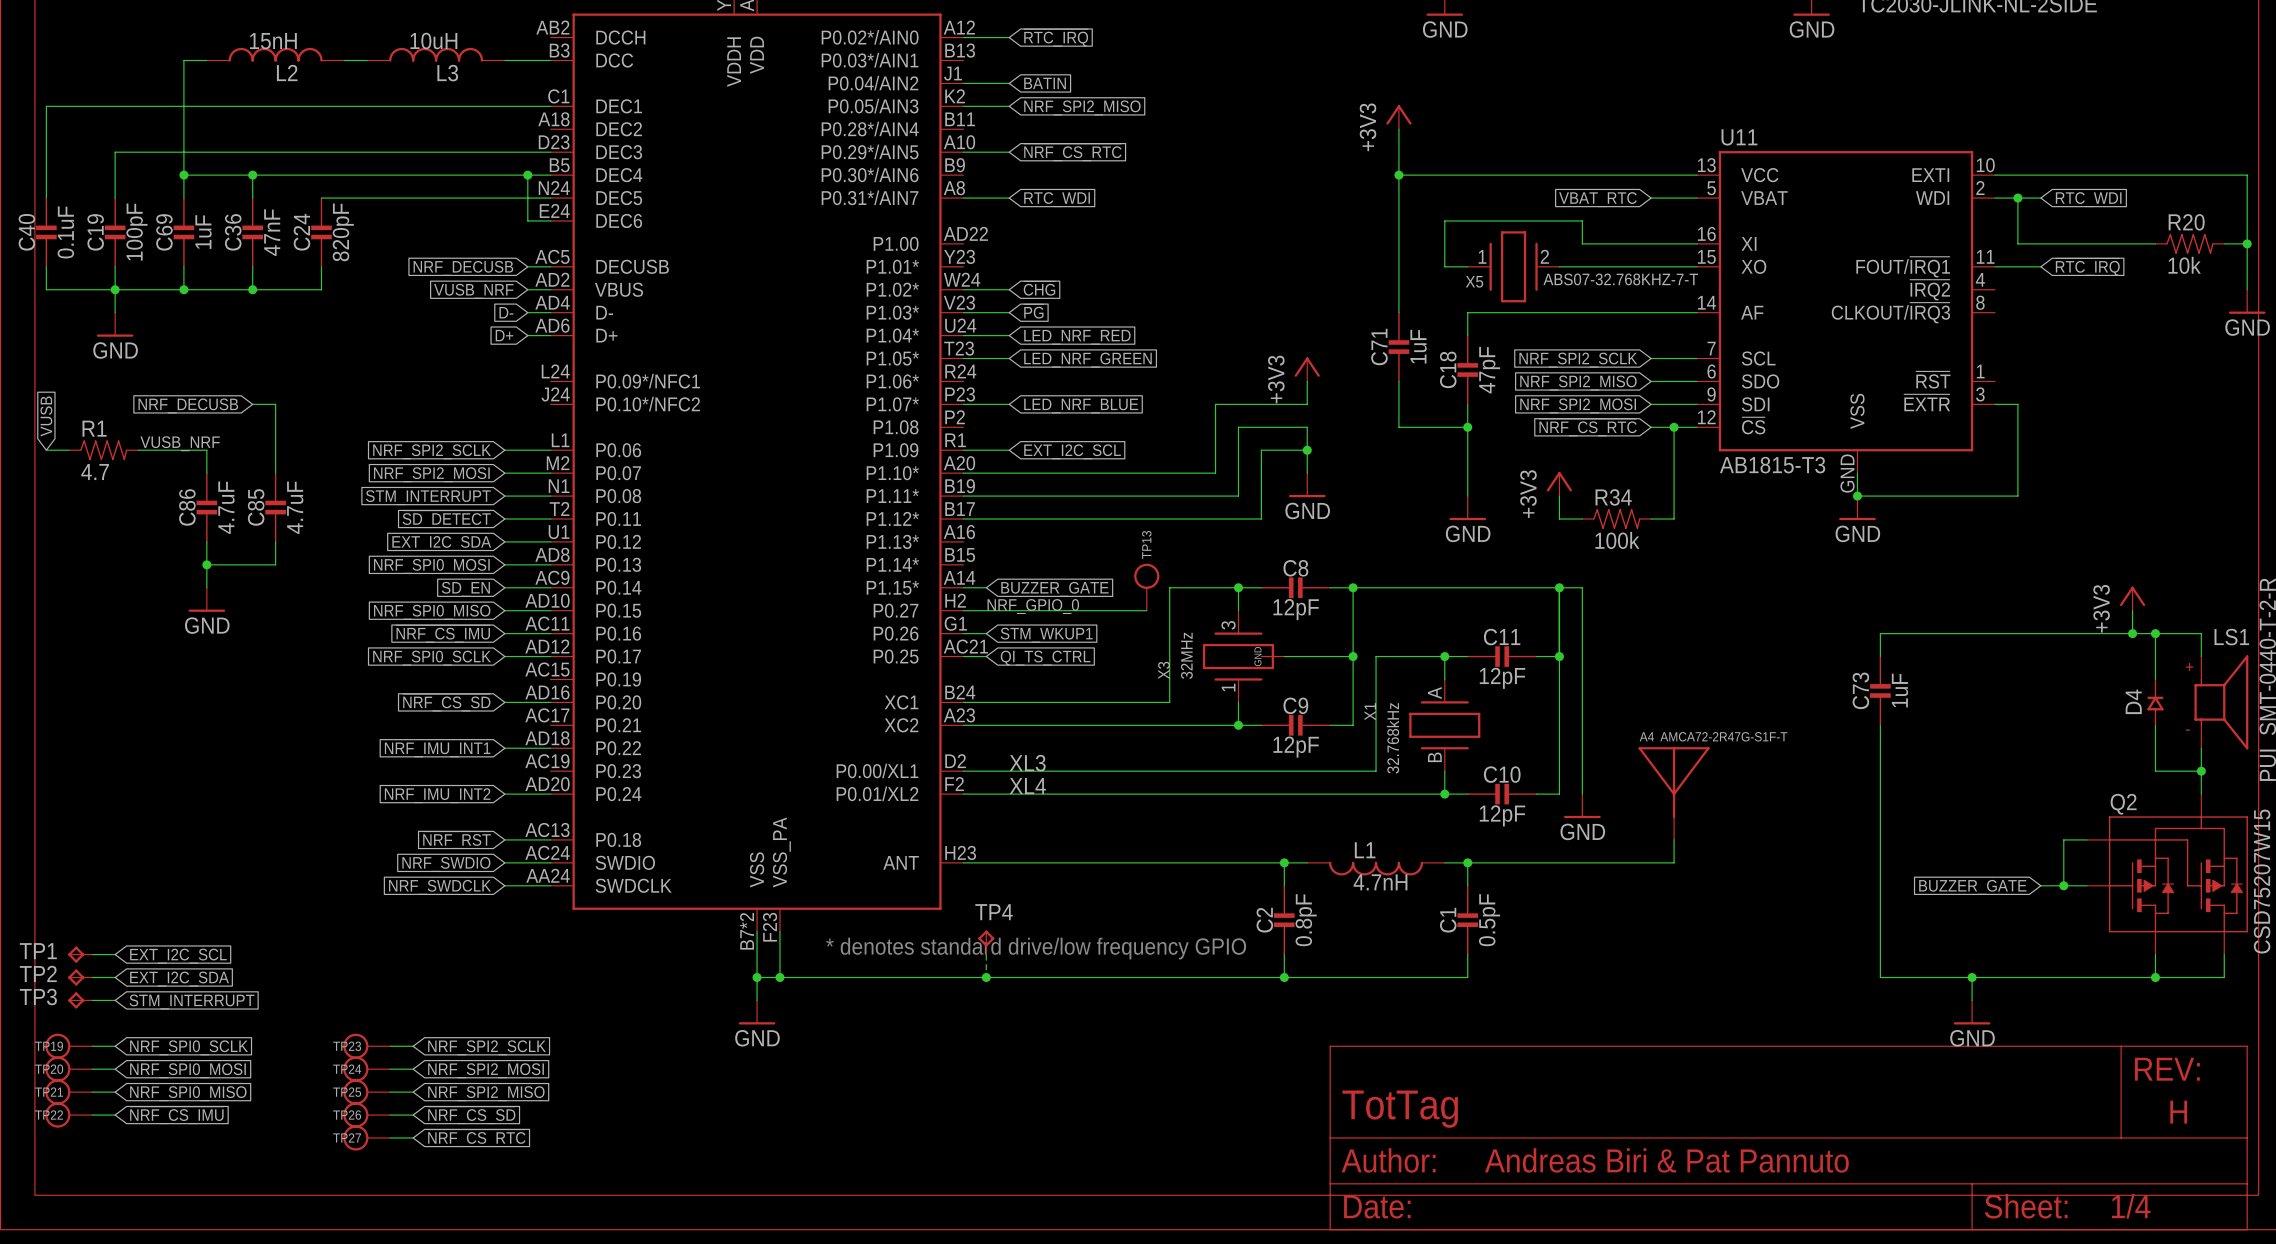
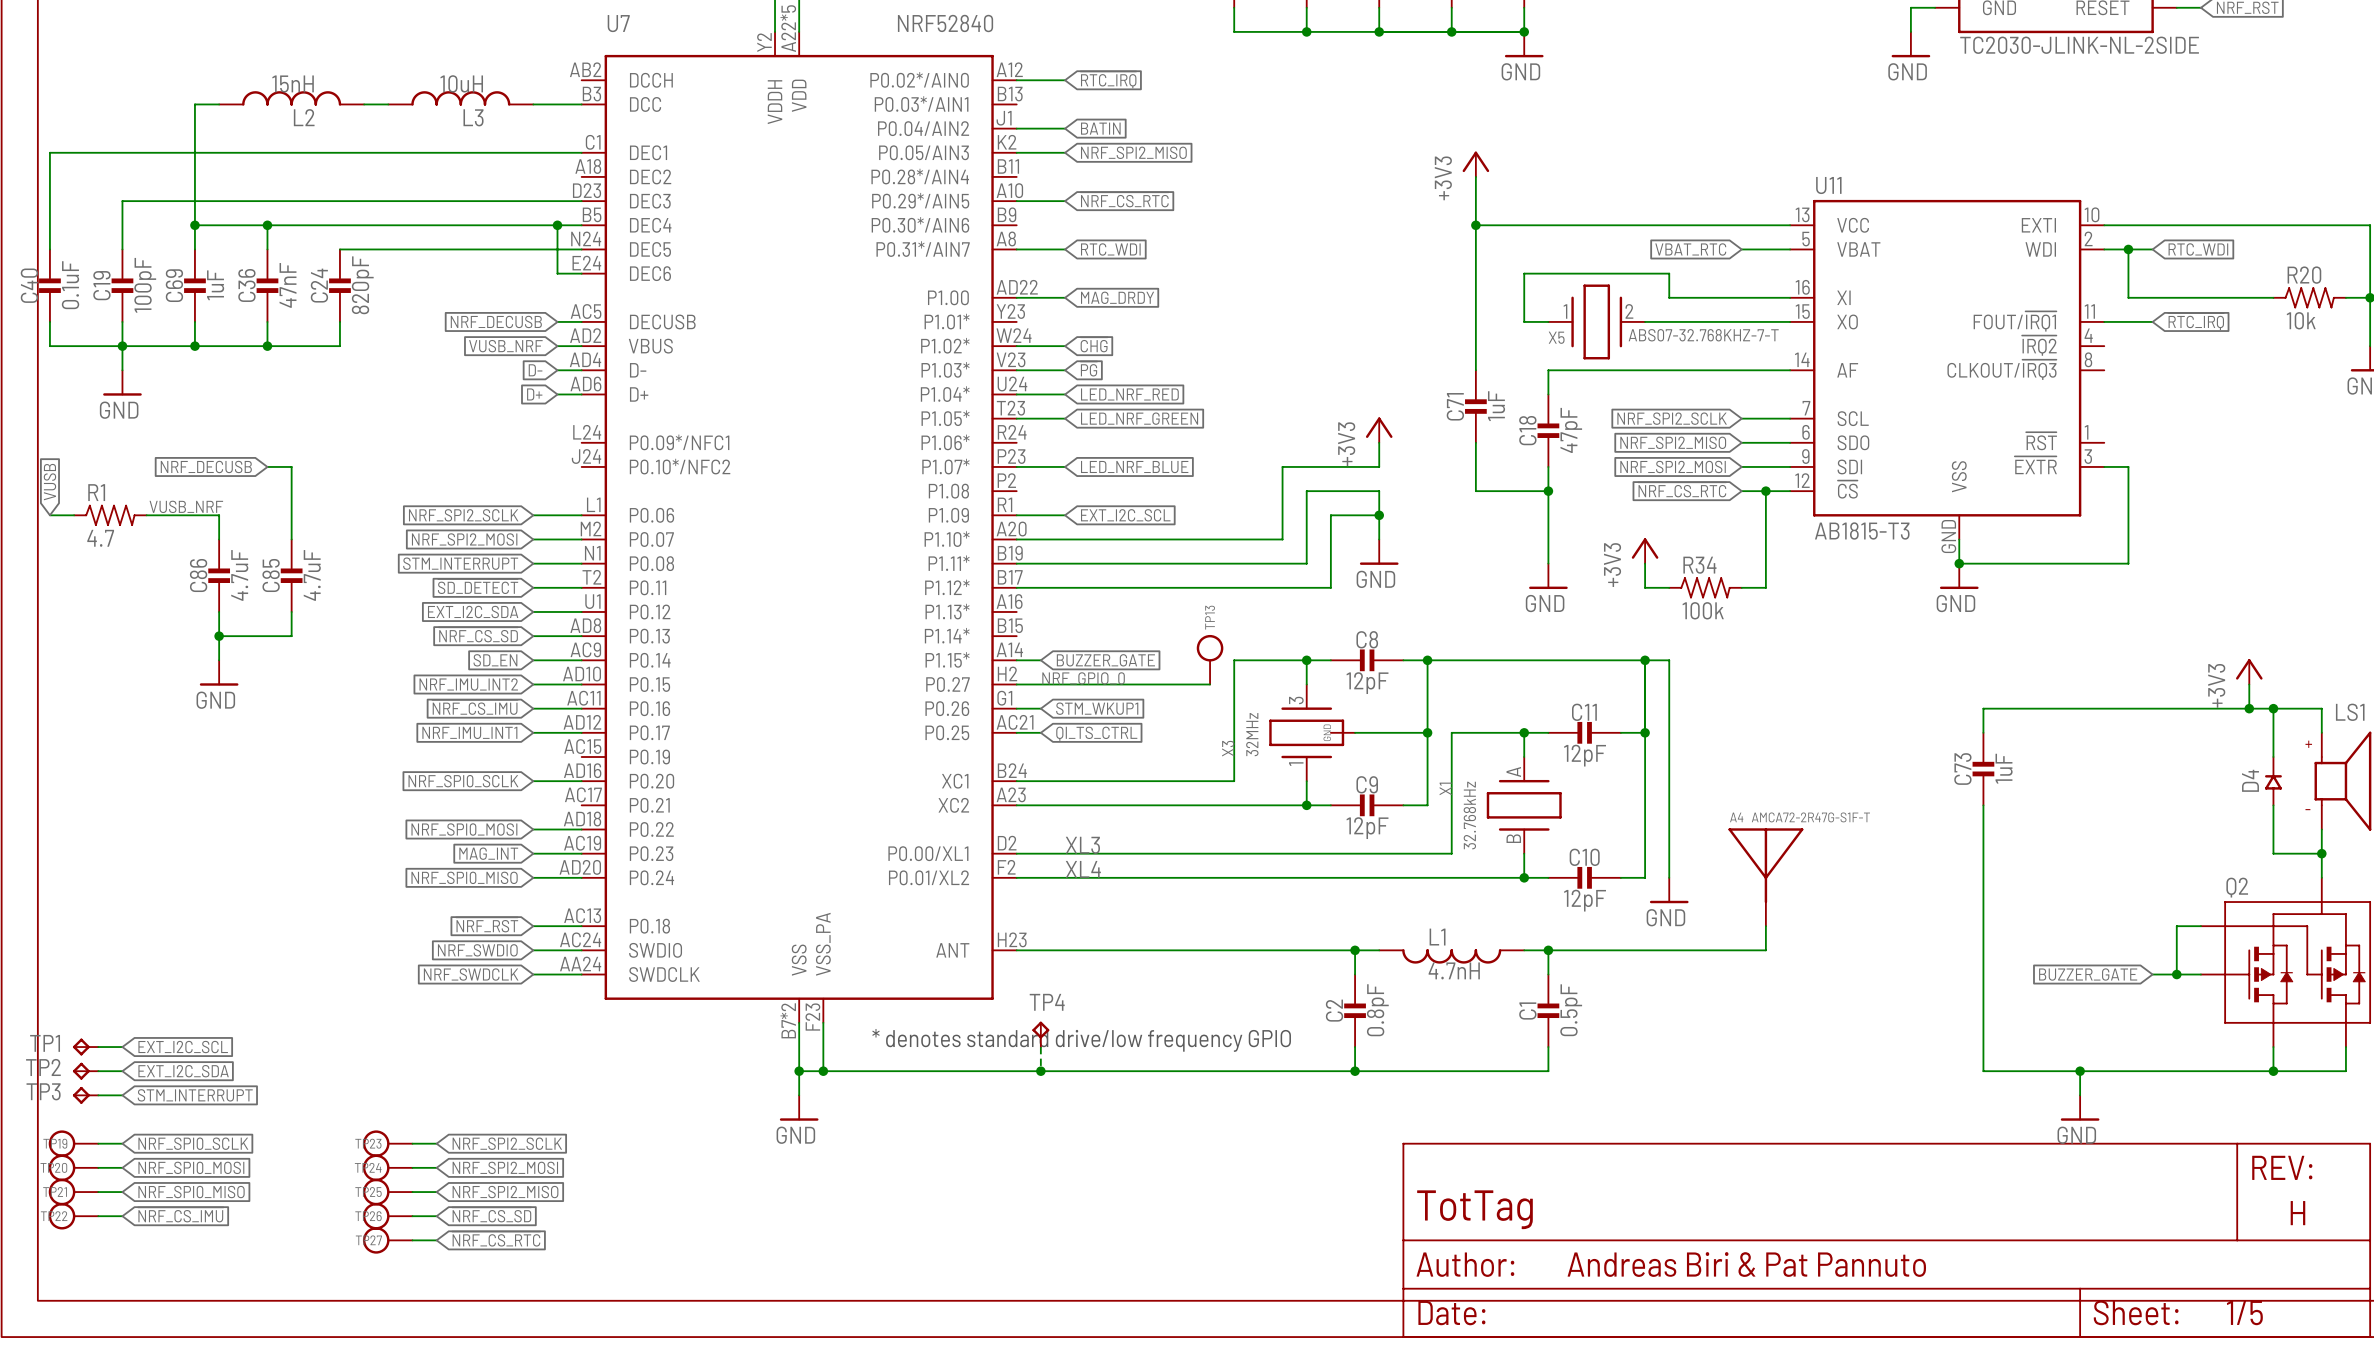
wire: none -> (1016, 297) (1065, 297)
global label: none -> MAG_DRDY (1117, 297)
global label: NRF_SPI0_MOSI (431, 566) -> ~{NRF_CS_SD} (478, 634)
global label: NRF_SPI0_MISO (432, 612) -> NRF_IMU_INT2 (468, 684)
global label: NRF_SPI0_SCLK (432, 658) -> NRF_IMU_INT1 (469, 732)
global label: ~{NRF_CS_SD} (446, 702) -> NRF_SPI0_SCLK (463, 781)
global label: NRF_IMU_INT1 (437, 749) -> NRF_SPI0_MOSI (464, 829)
wire: none -> (533, 853) (581, 853)
global label: none -> MAG_INT (488, 853)
global label: NRF_IMU_INT2 (437, 795) -> NRF_SPI0_MISO (464, 877)
part text: 1/4 (2131, 1206) -> 1/5 (2244, 1312)

